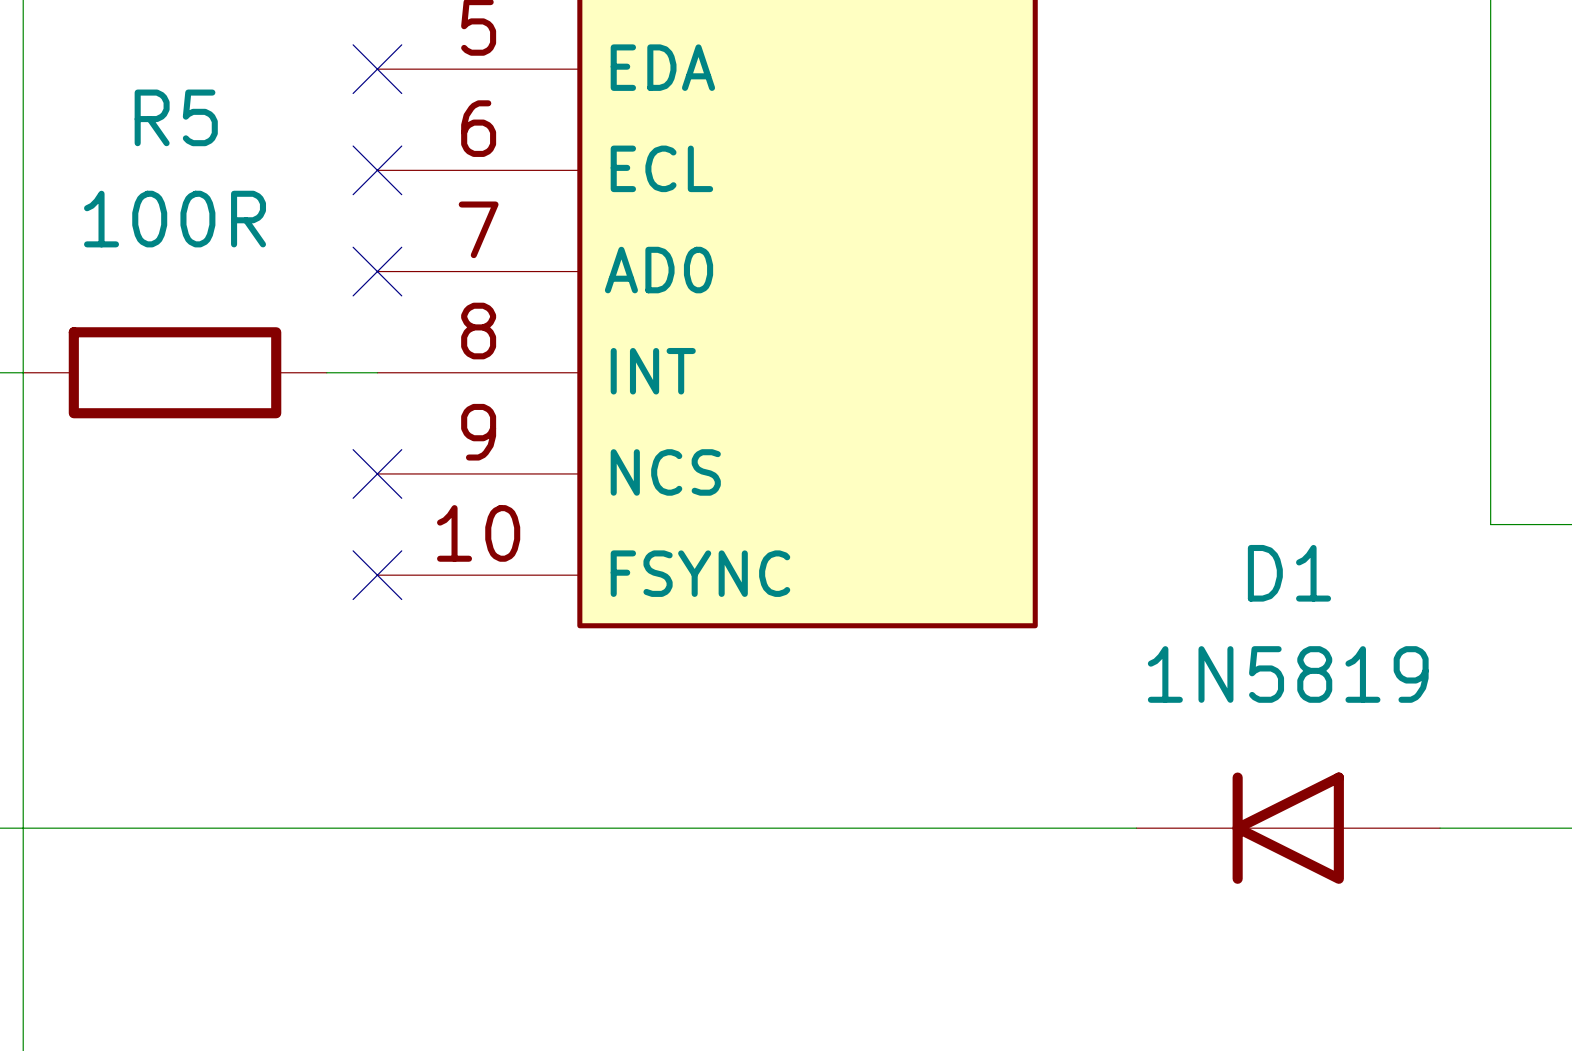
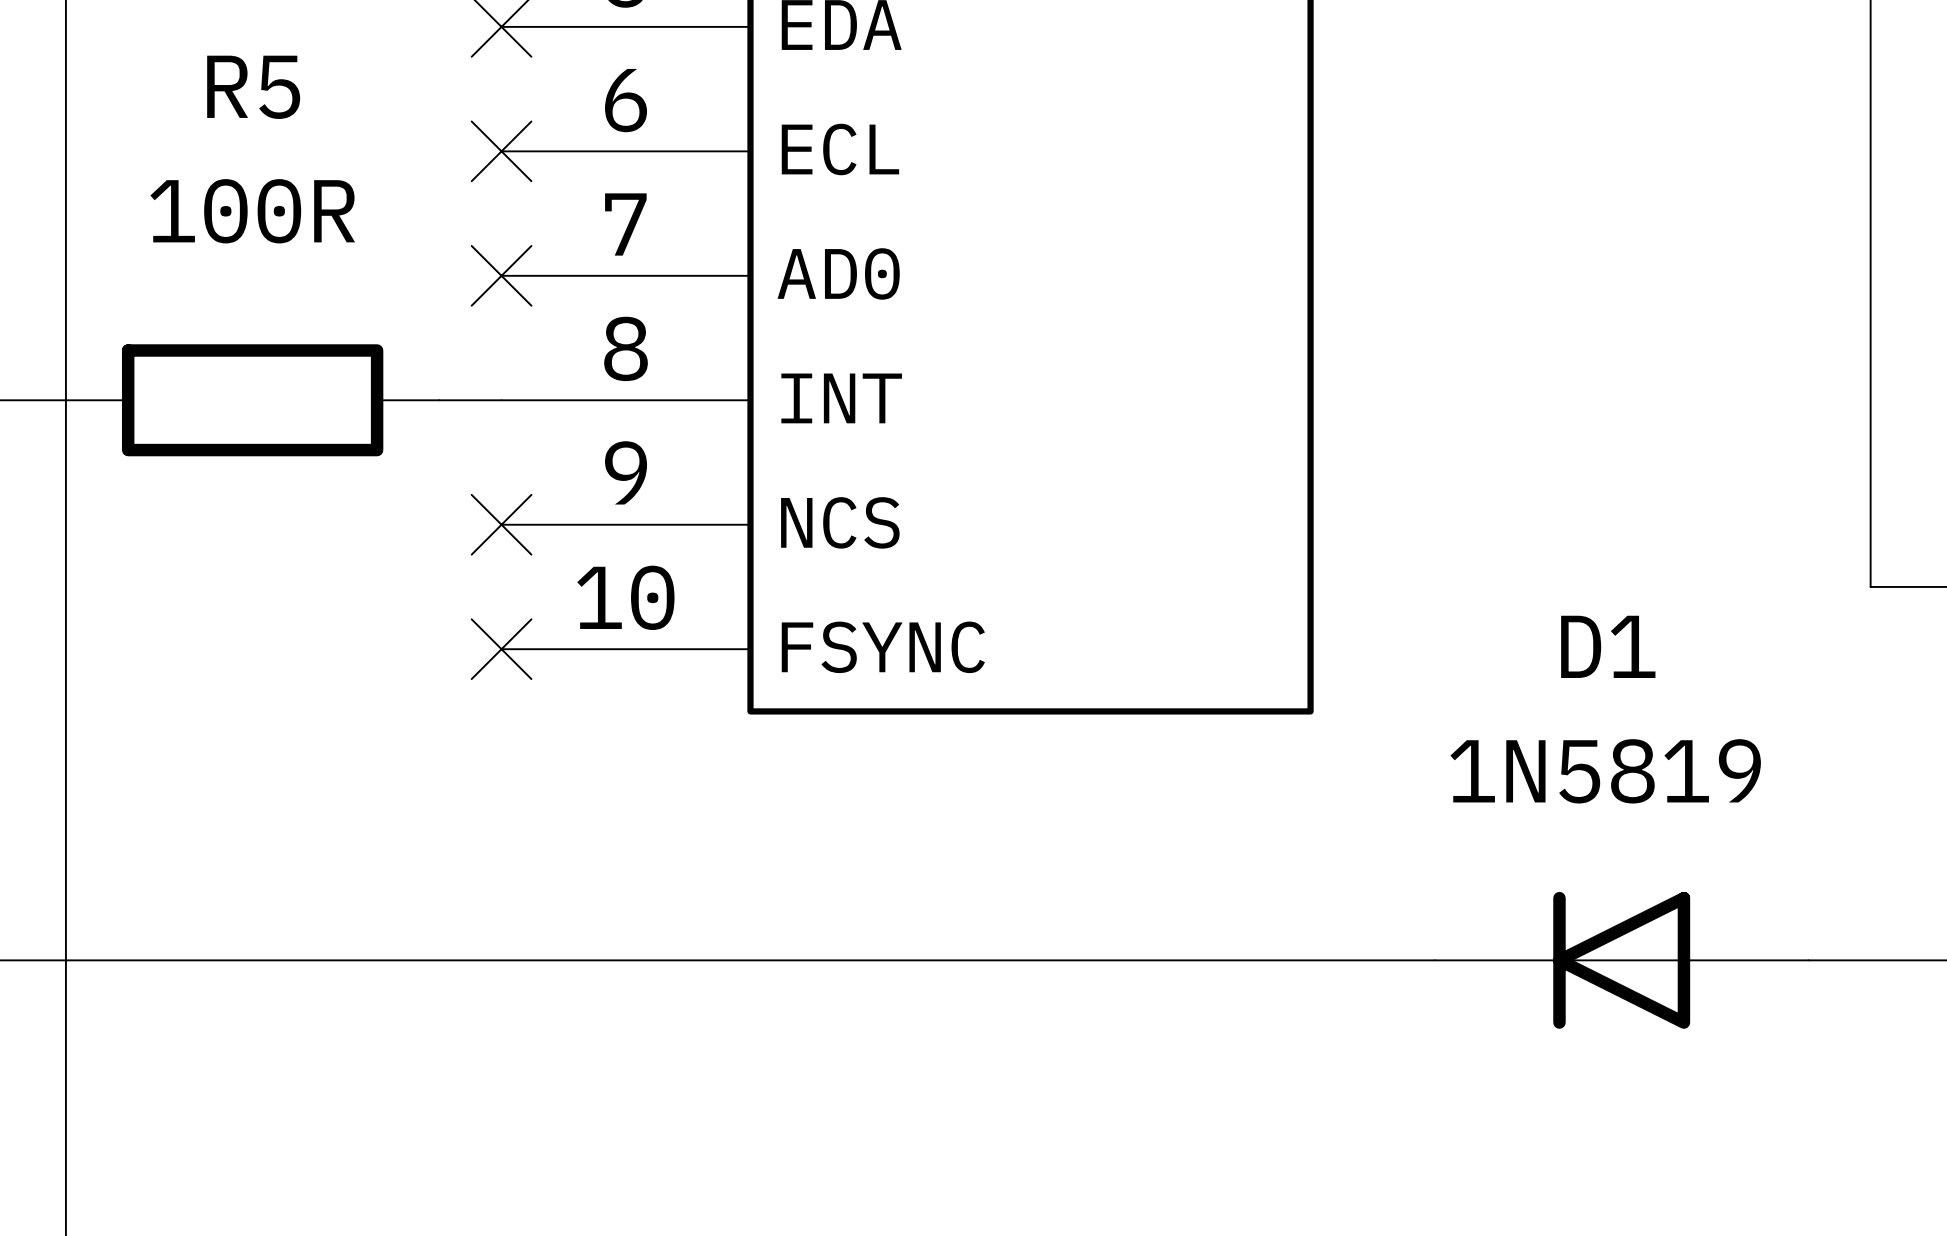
D1 name position: D1 (1289, 573) -> D1 (1608, 646)
D1 value position: 1N5819 (1288, 674) -> 1N5819 (1605, 771)

